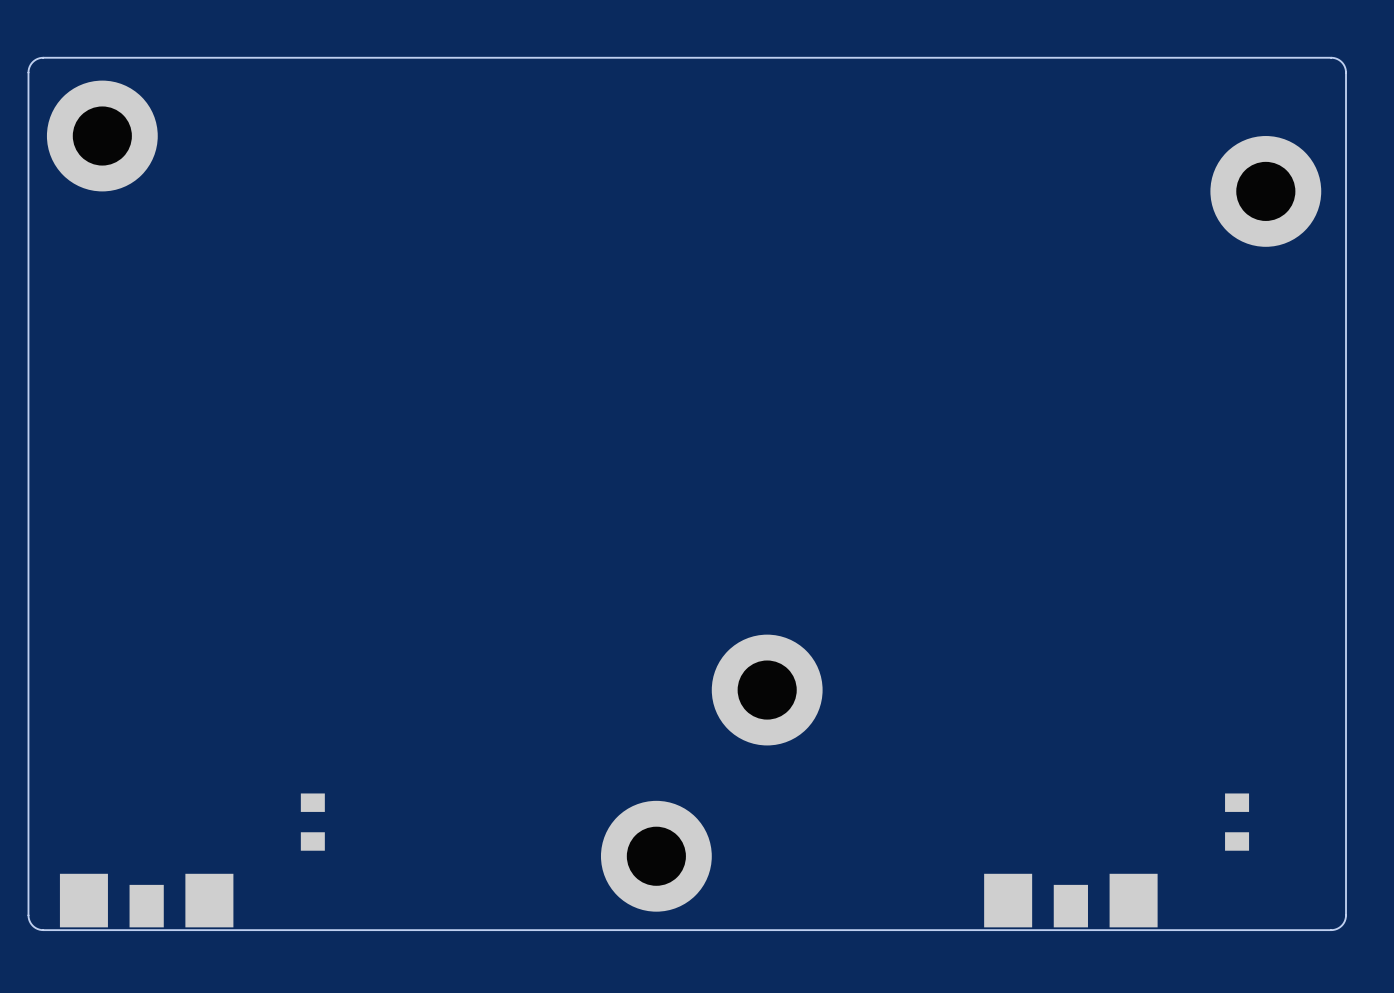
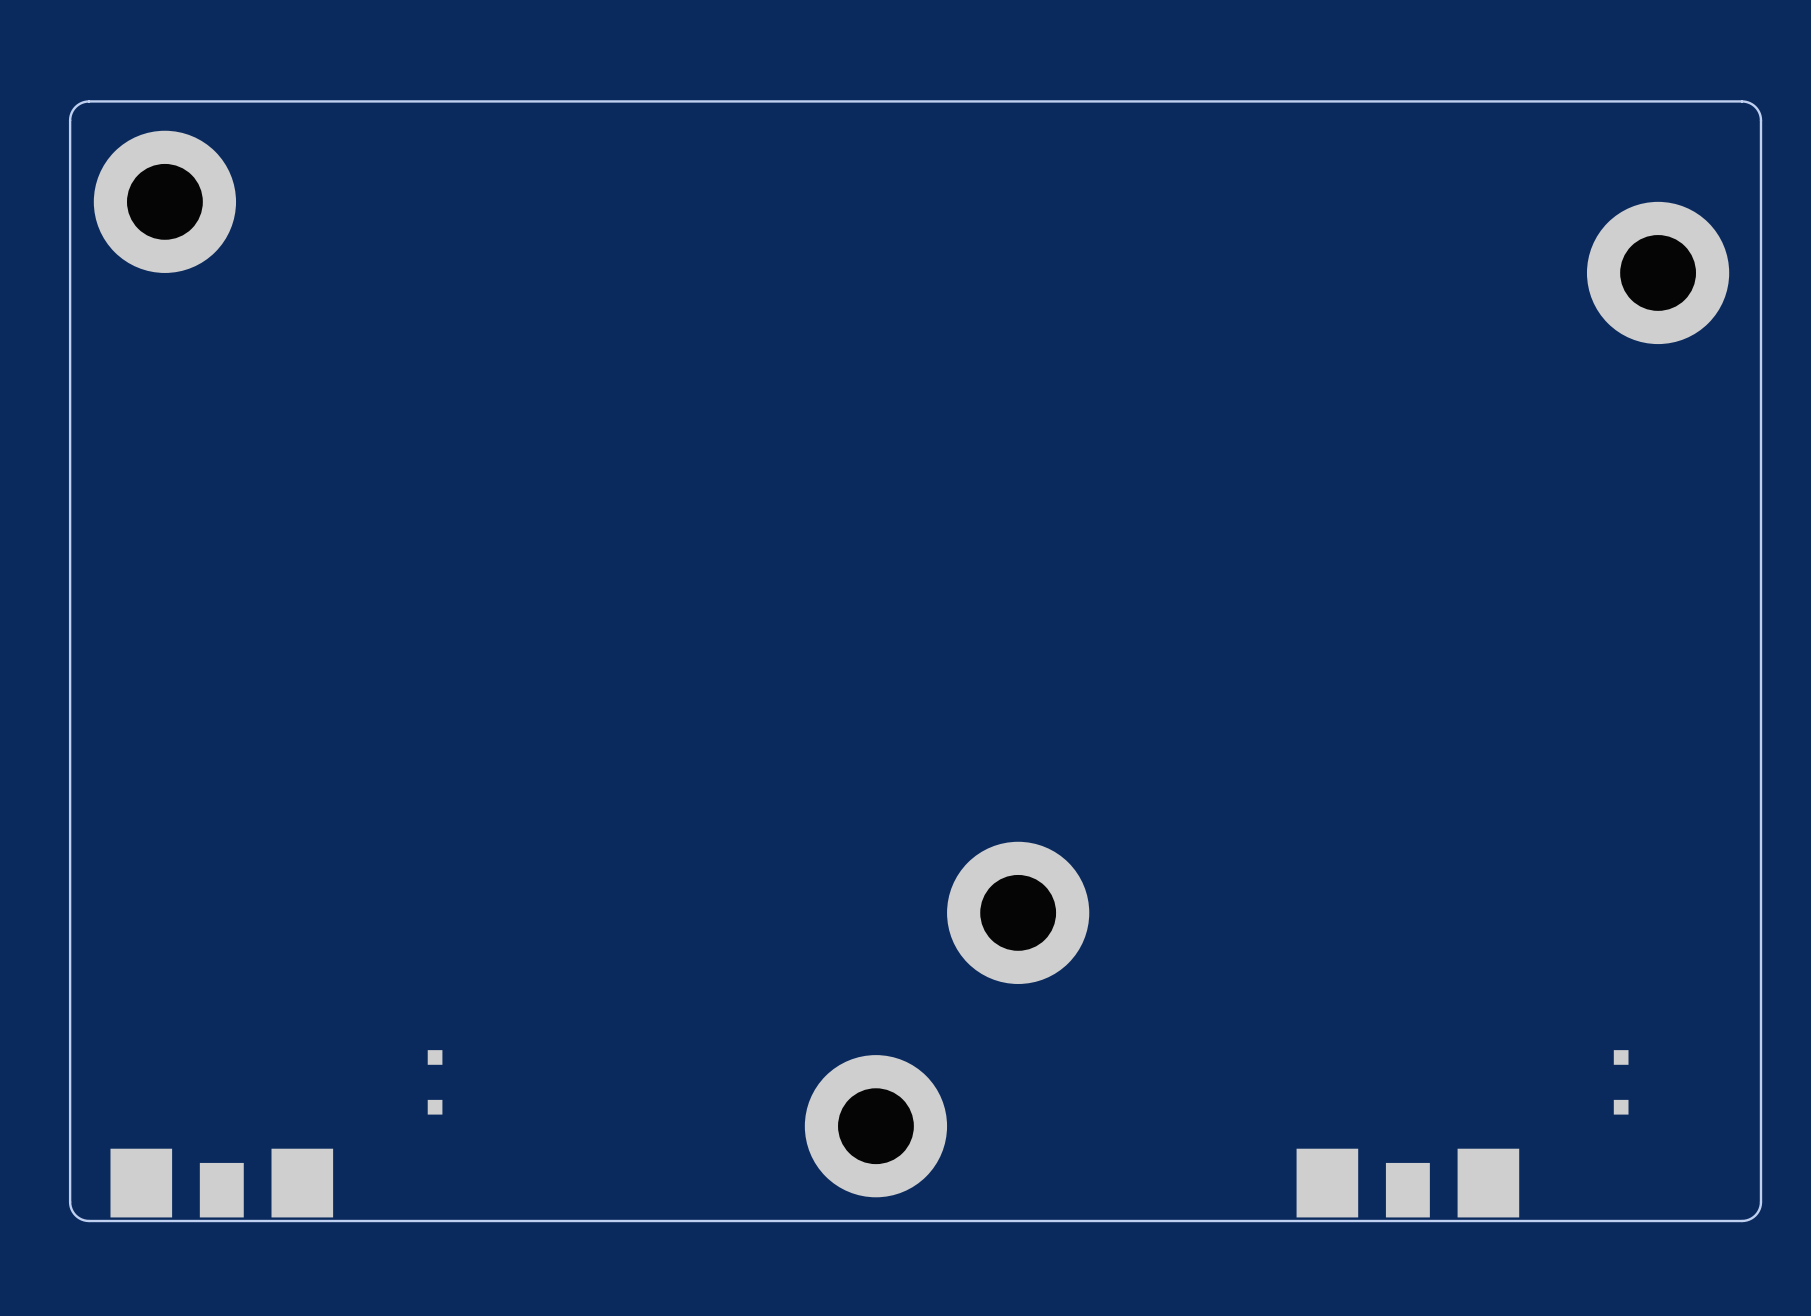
part footprint: [300, 793, 325, 851] -> [427, 1050, 443, 1115]
part footprint: [1225, 793, 1250, 851] -> [1613, 1050, 1629, 1115]

